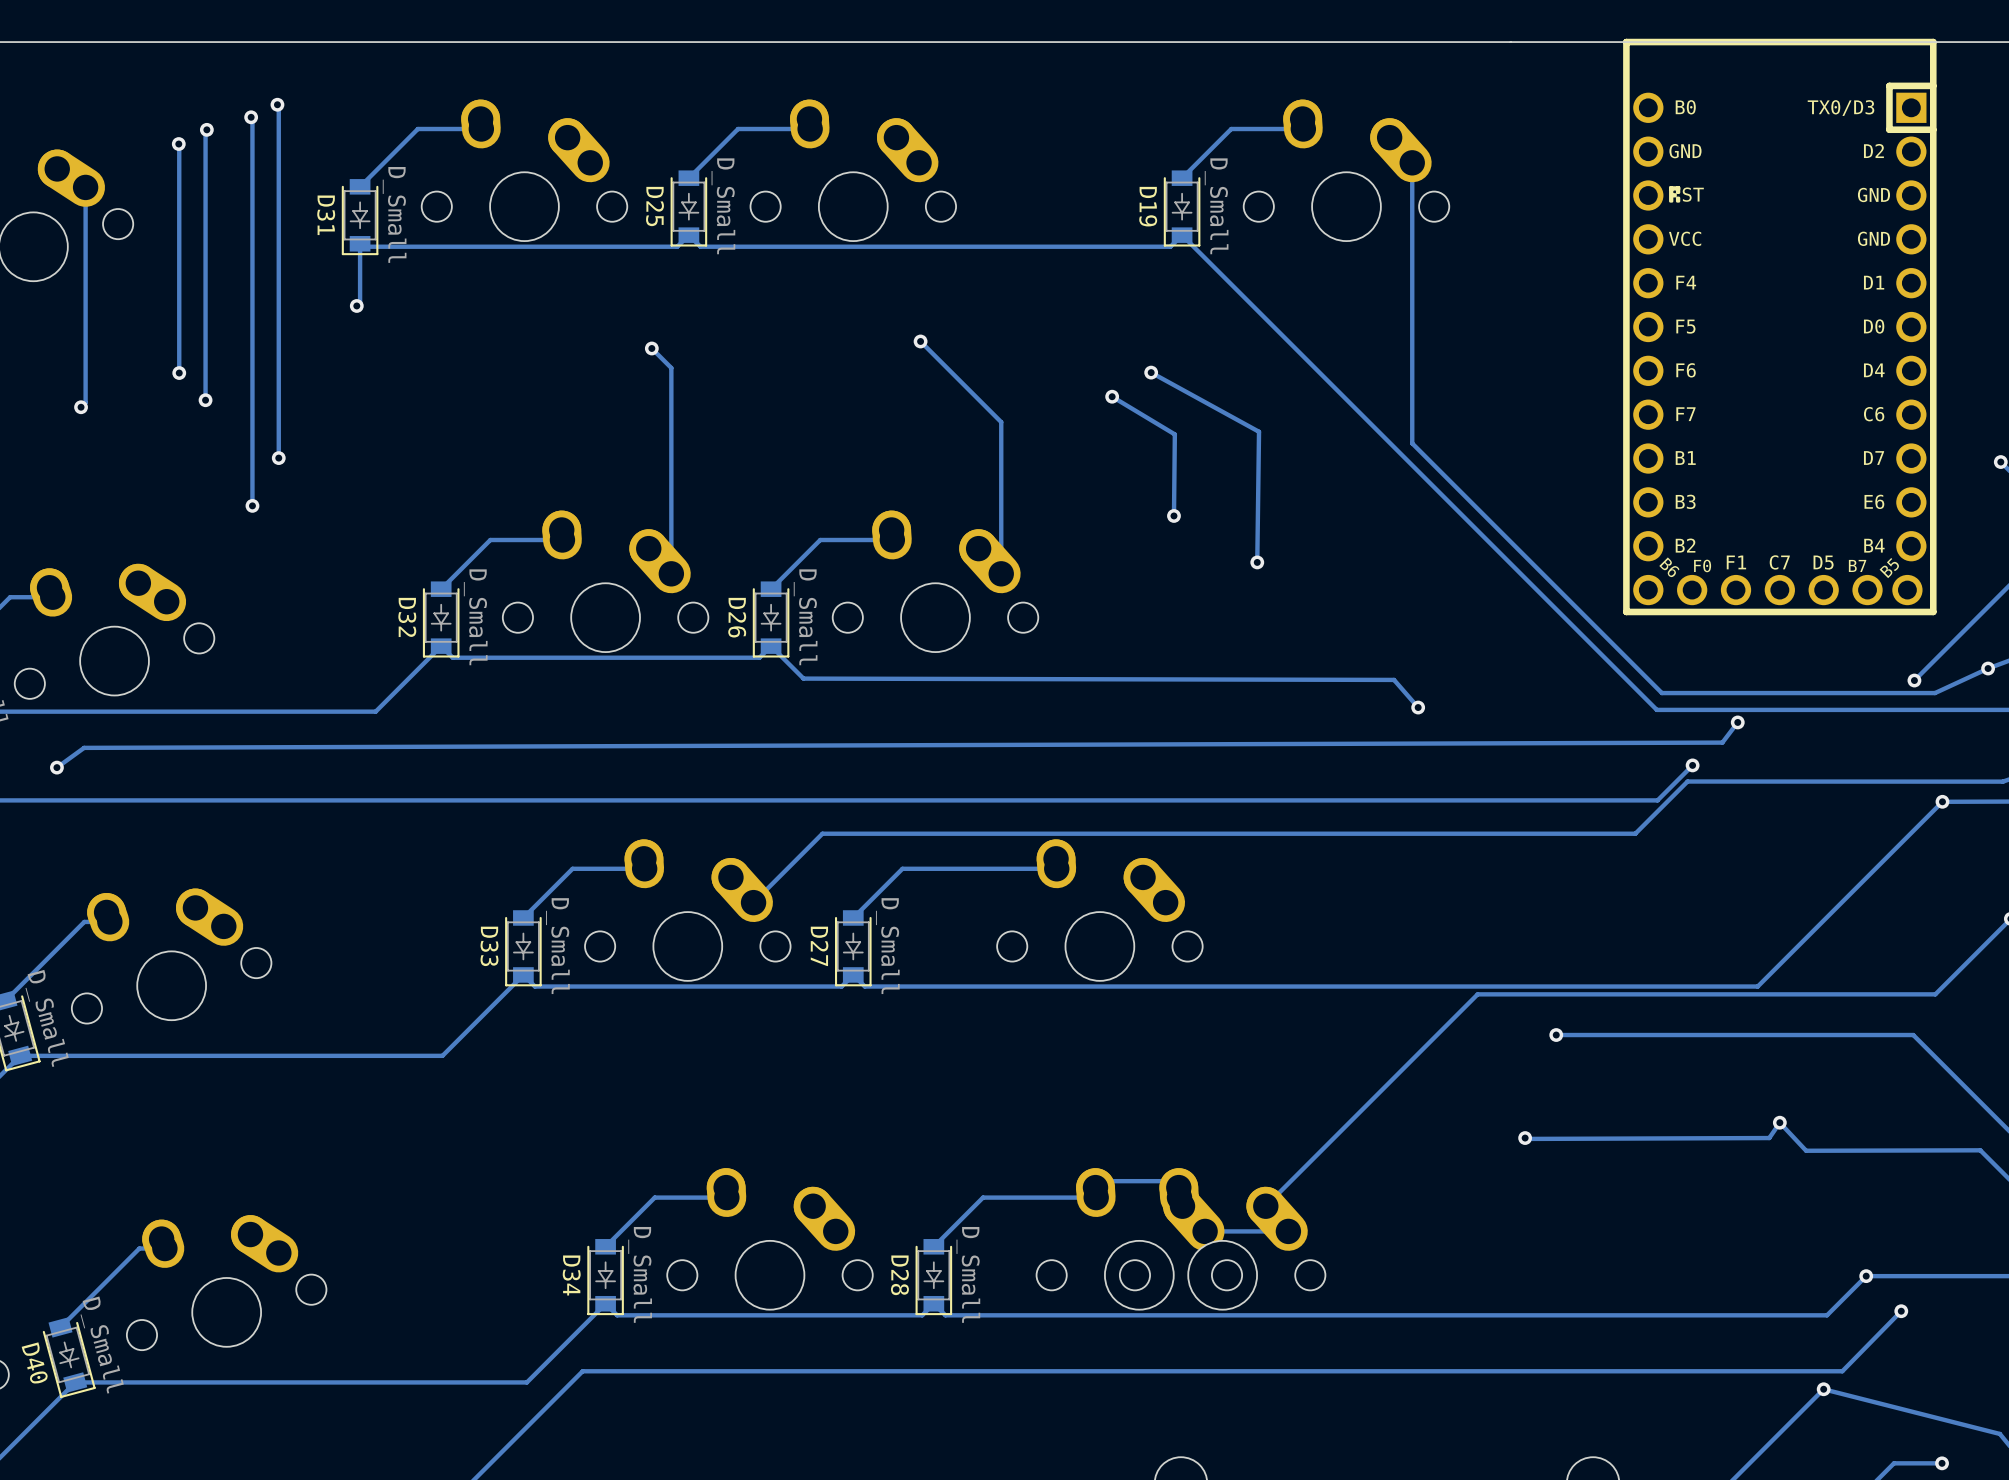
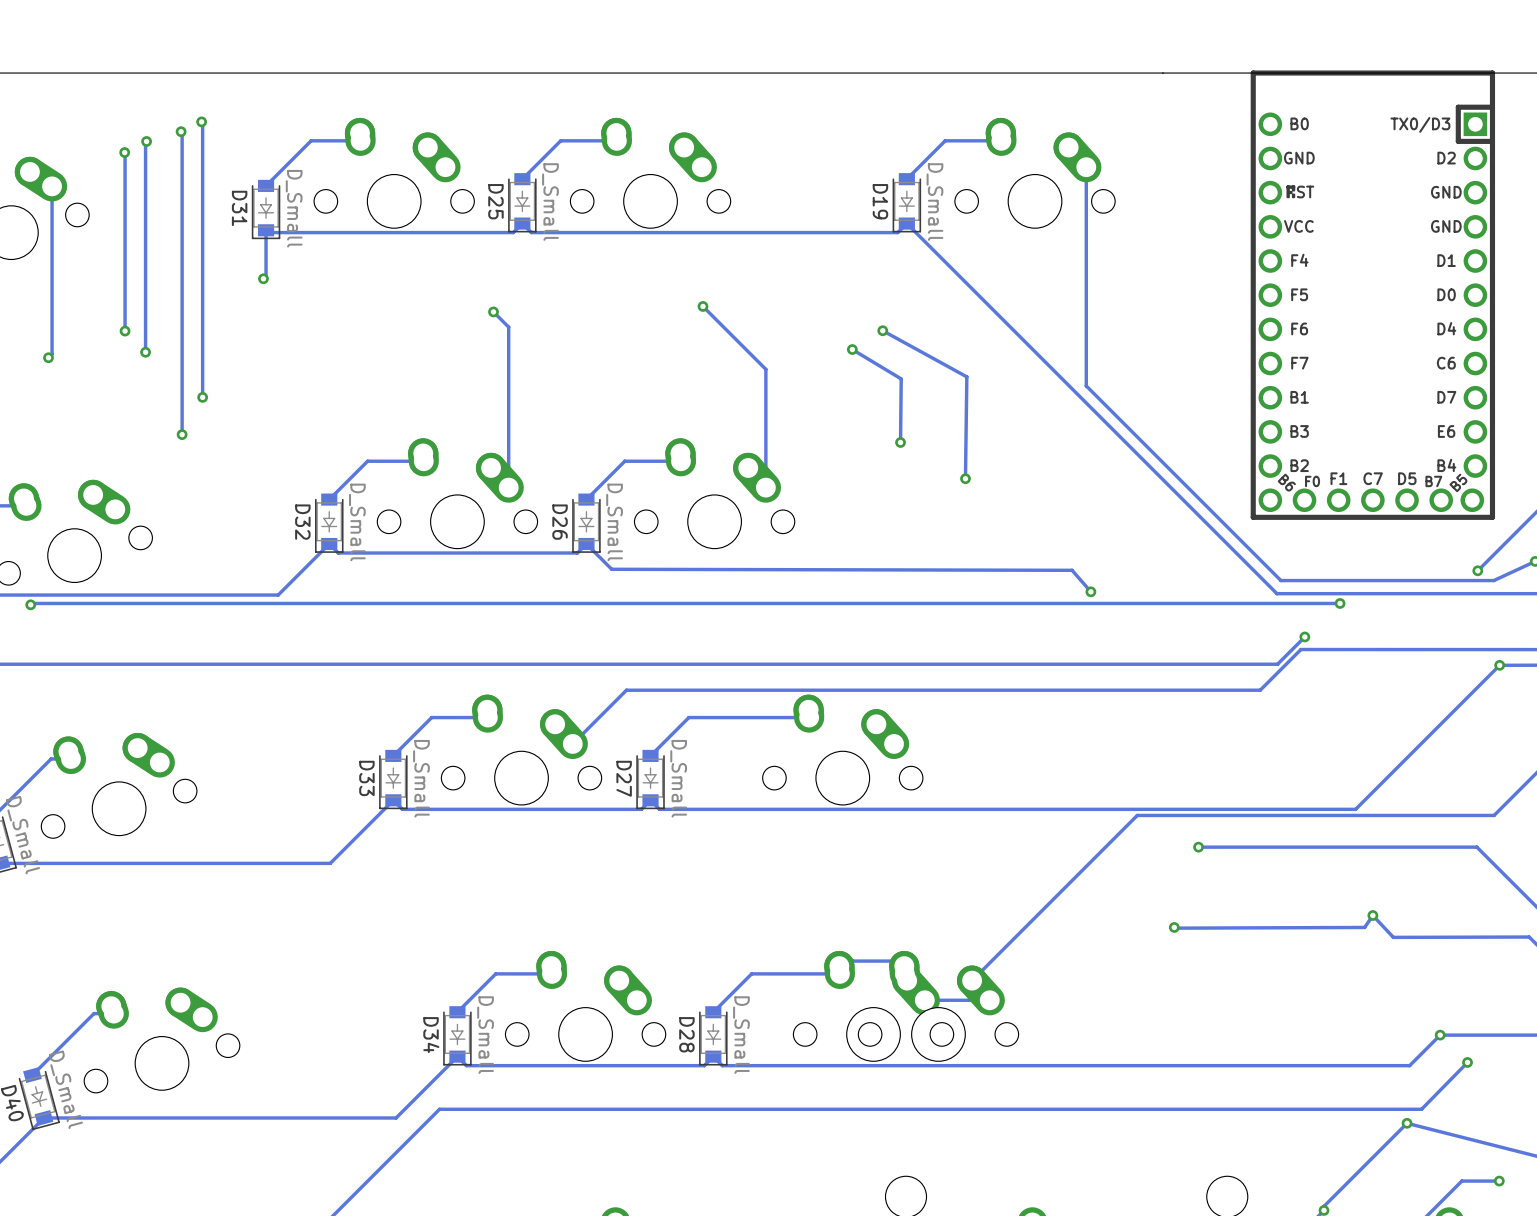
track: (1737, 722) (1722, 742) (84, 747) (56, 767) -> (1340, 603) (30, 604)
via position: (56, 767) -> (30, 604)

